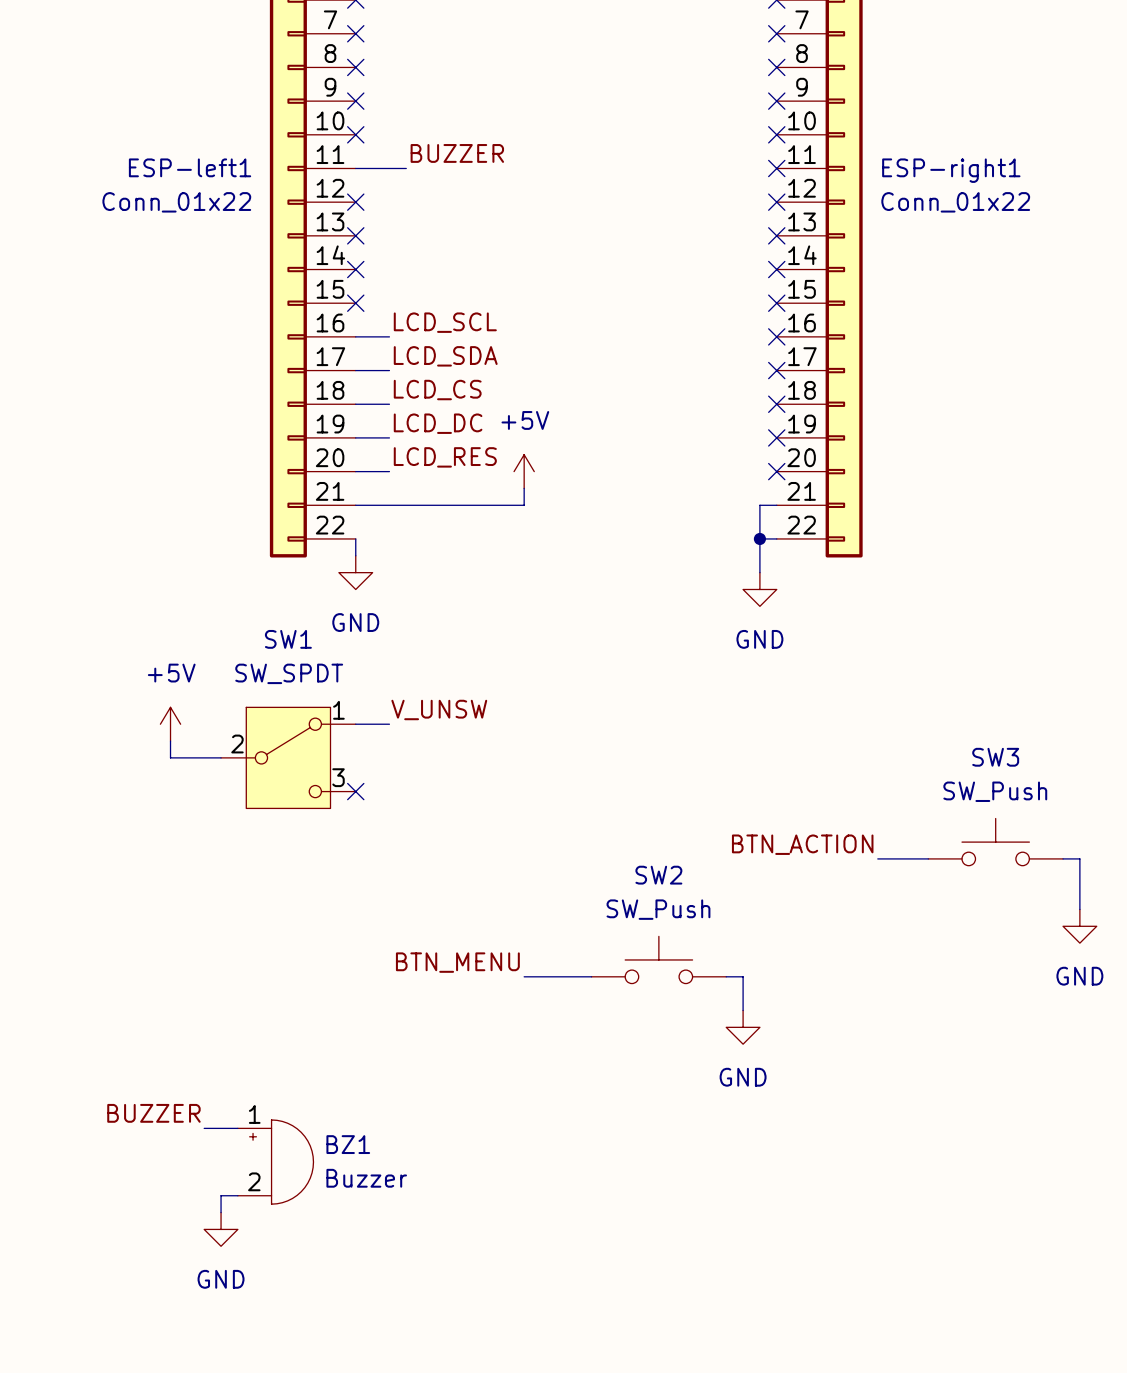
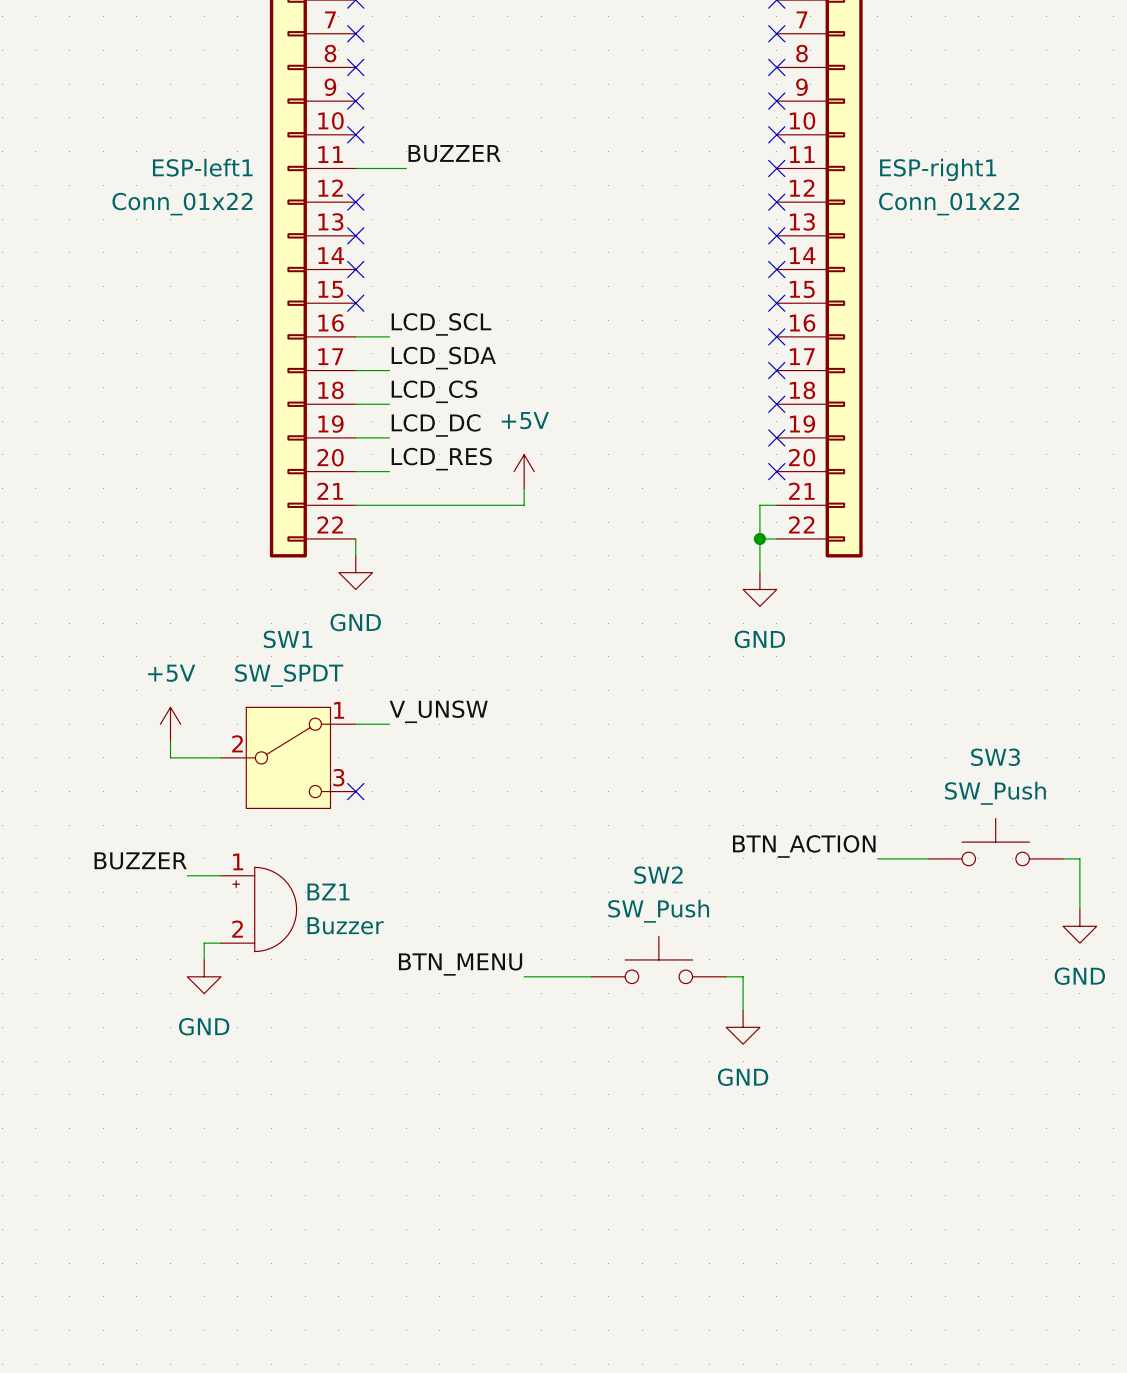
label position: BUZZER (153, 1113) -> BUZZER (140, 860)
wire: (204, 1128) (237, 1128) -> (187, 875) (221, 875)
BZ1 position: (275, 1162) -> (258, 909)
wire: (237, 1195) (221, 1195) (221, 1212) -> (221, 943) (204, 943) (204, 959)
power symbol position: GND (221, 1229) -> GND (204, 976)

